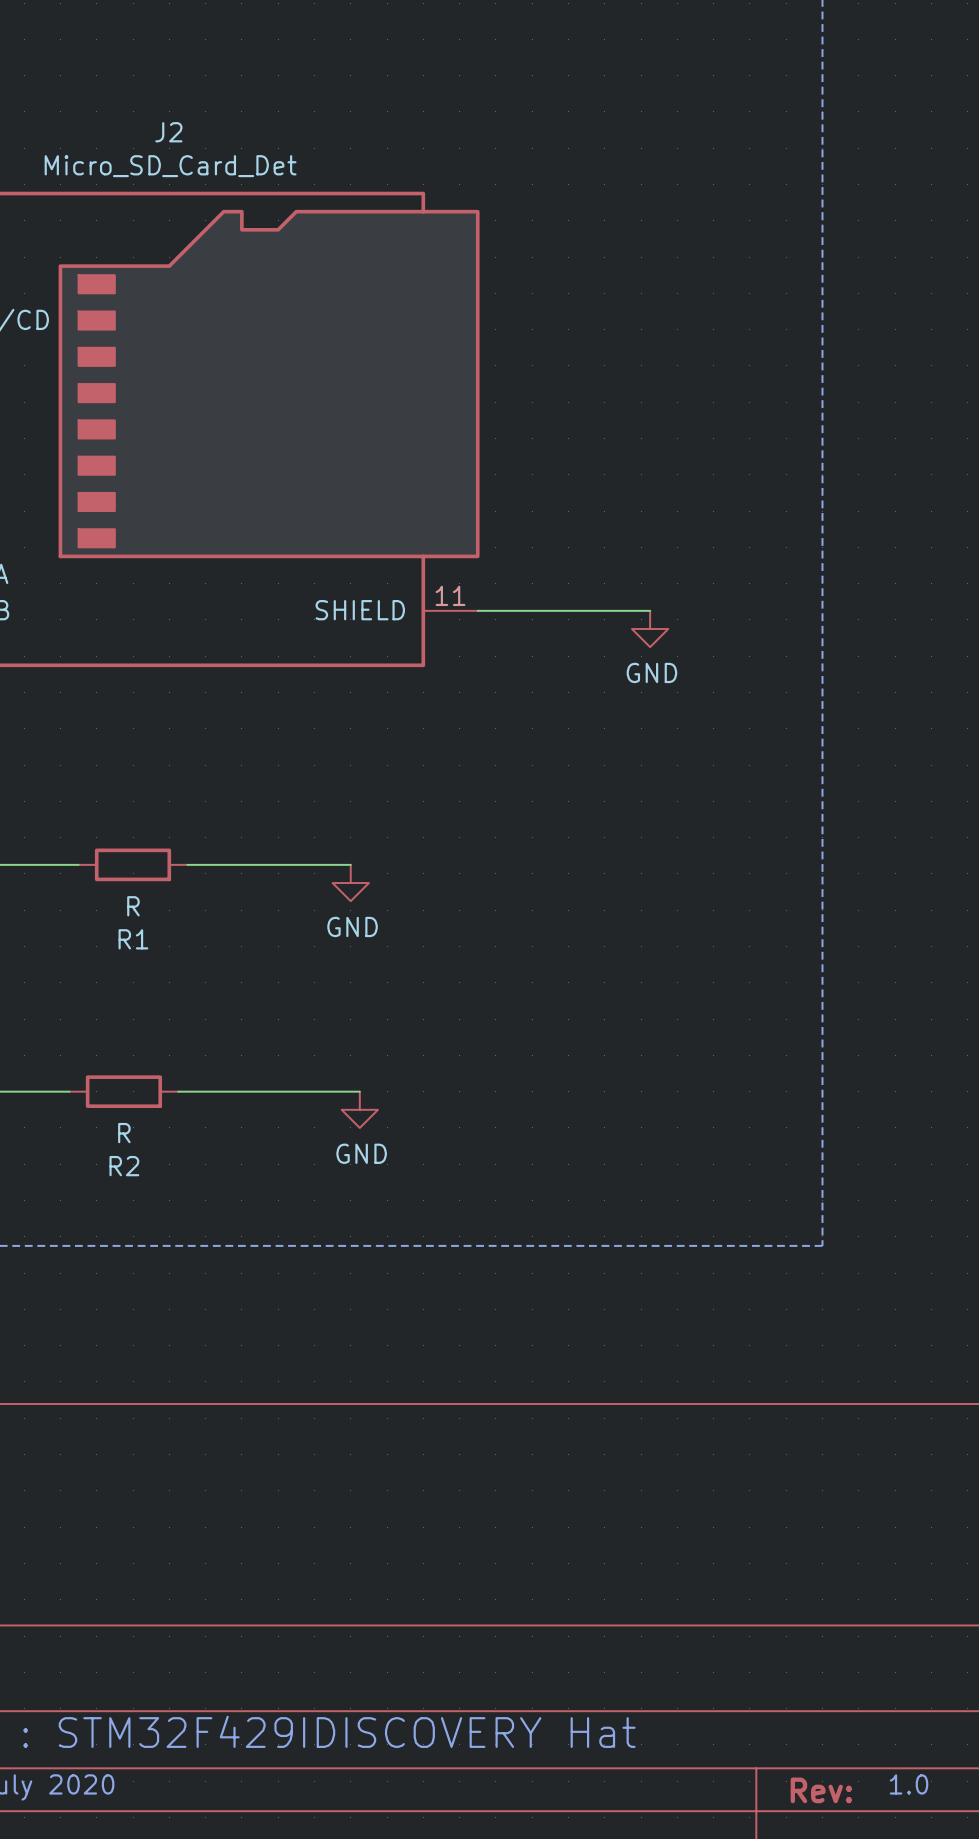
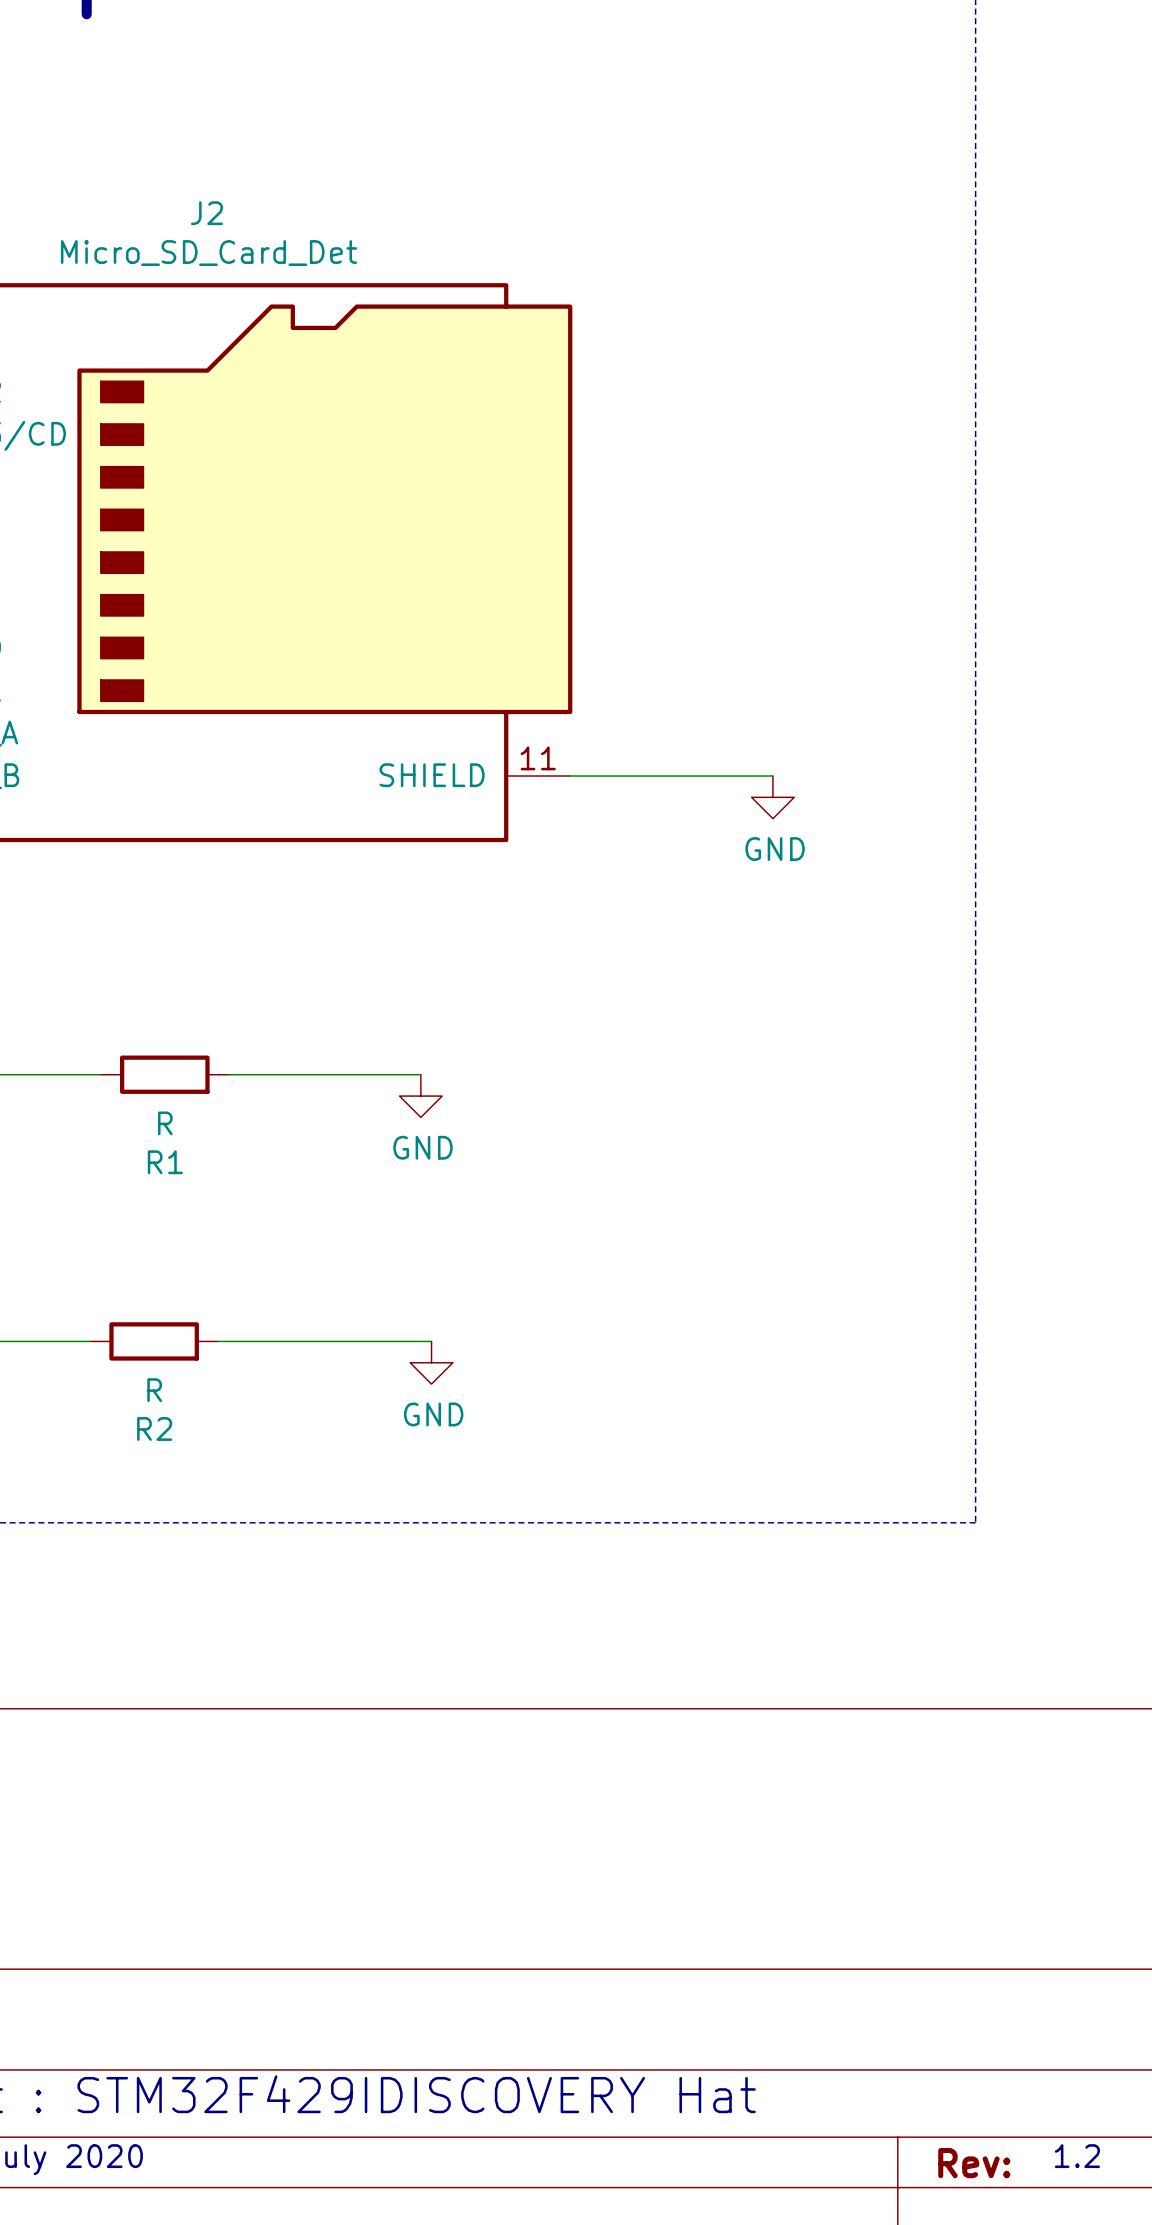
text: 1.0 (909, 1784) -> 1.2 (1077, 2156)

